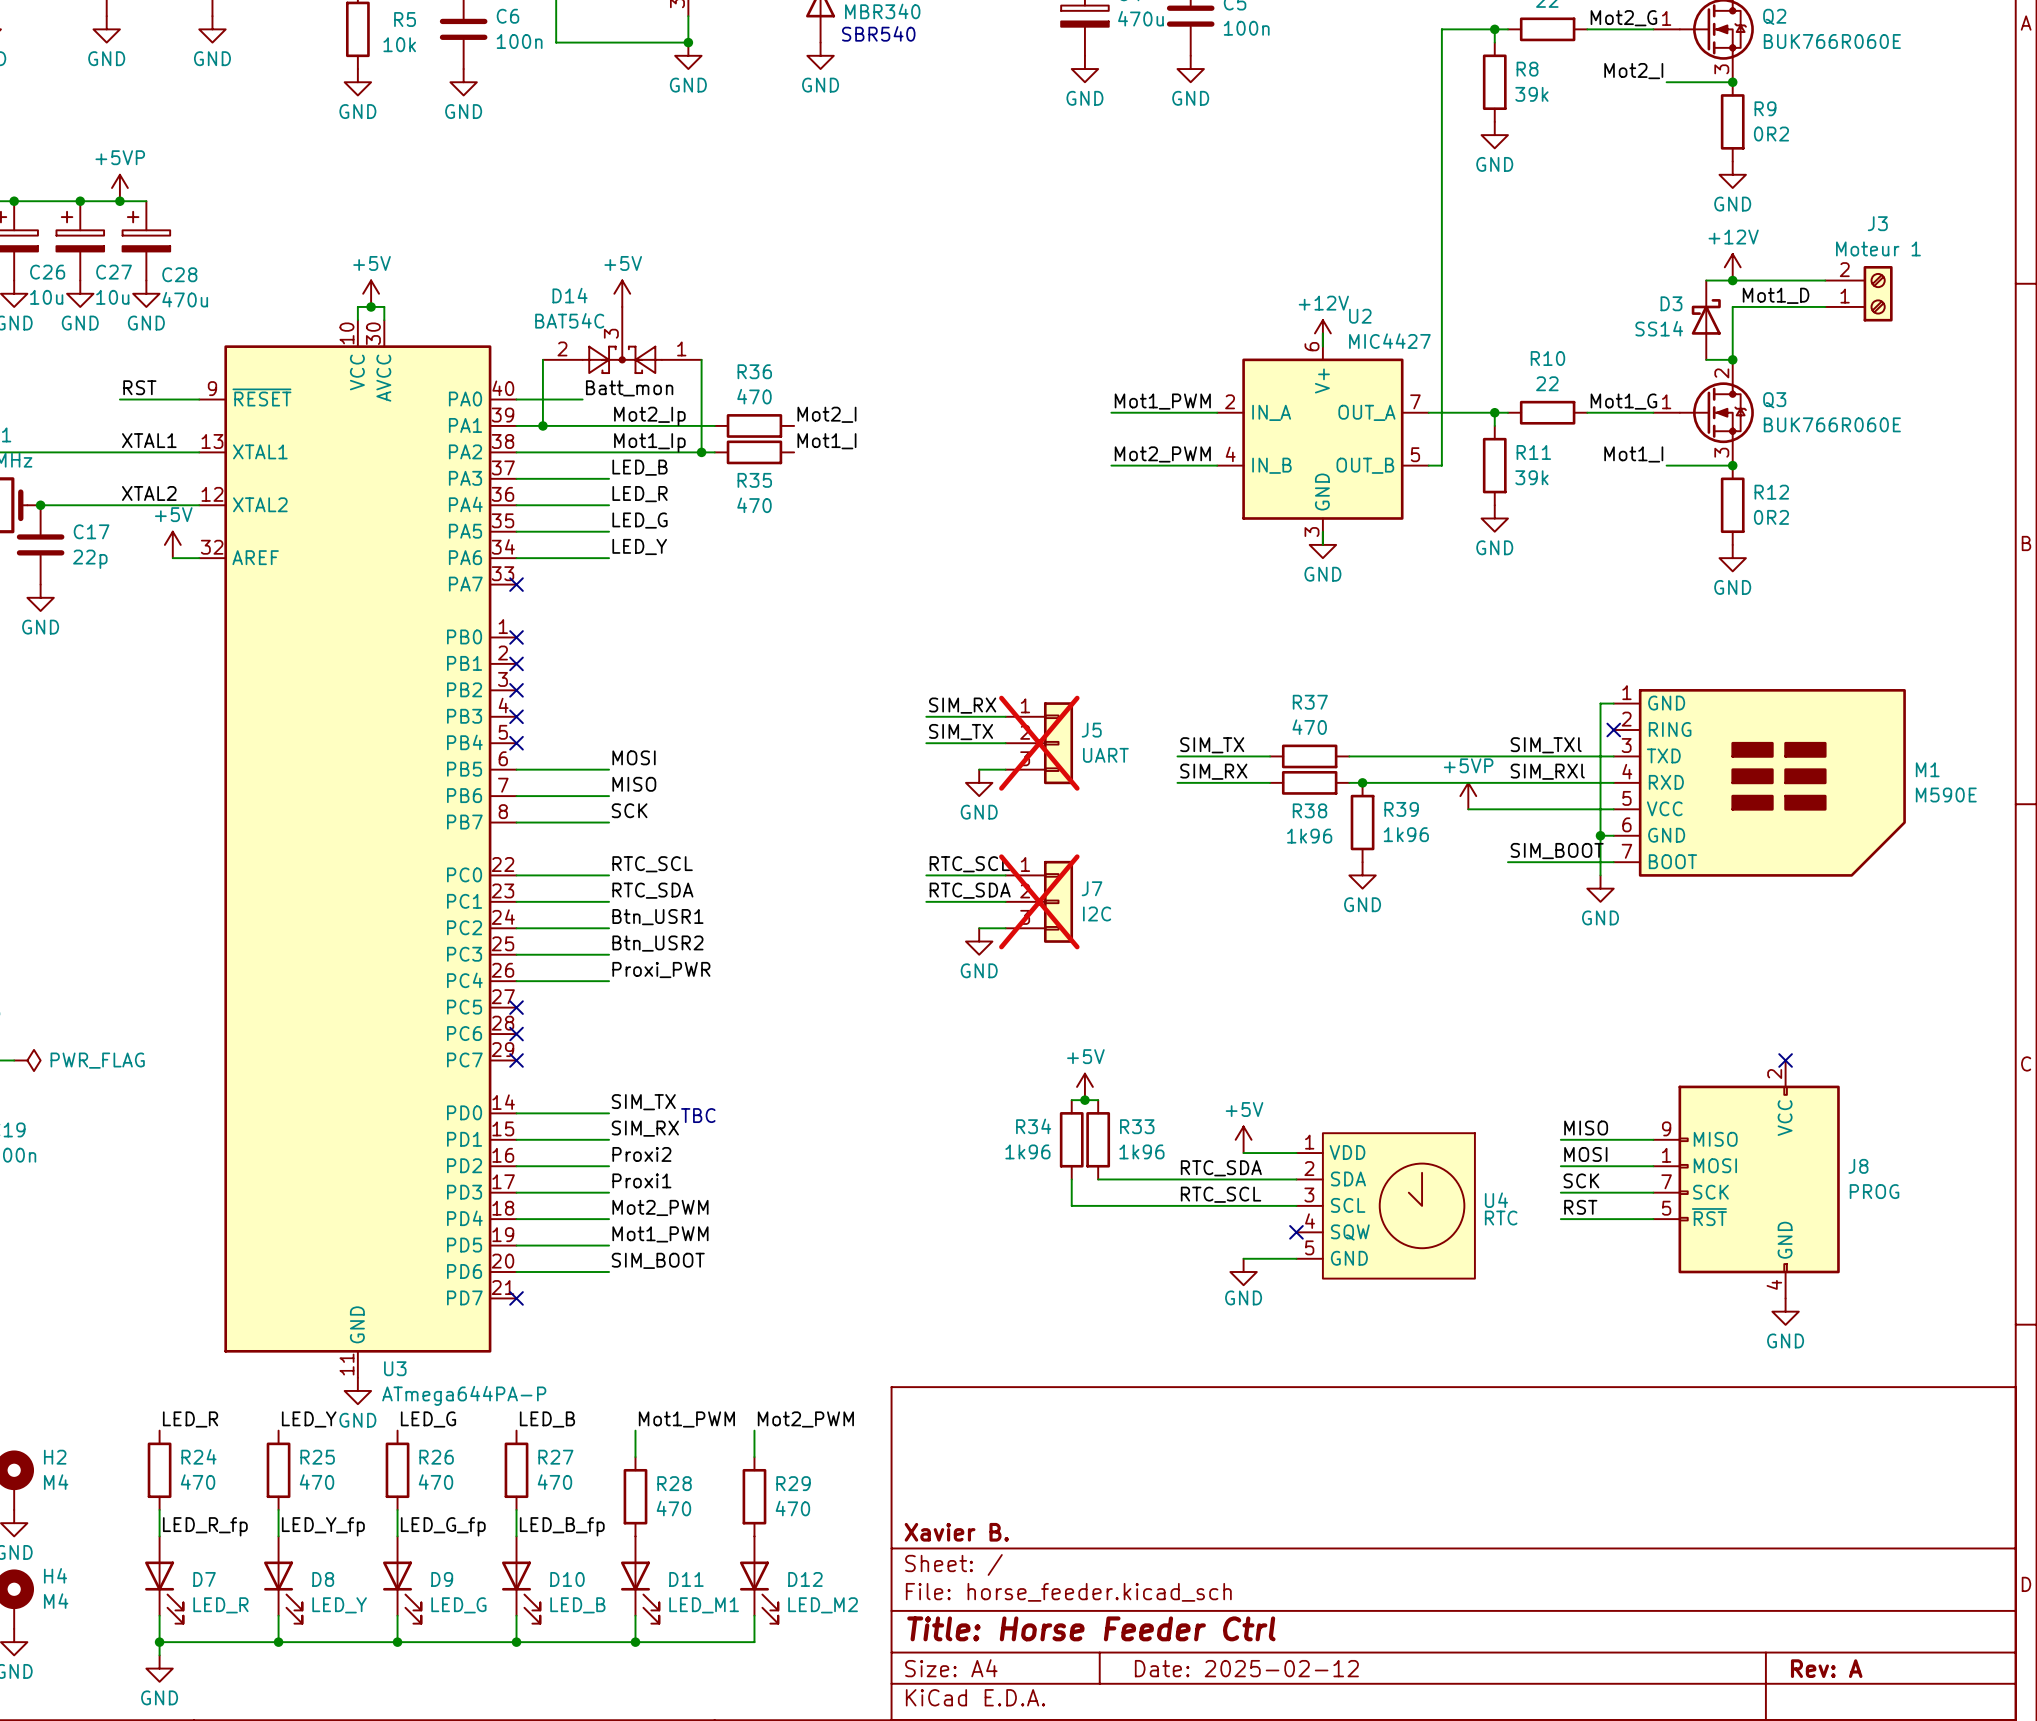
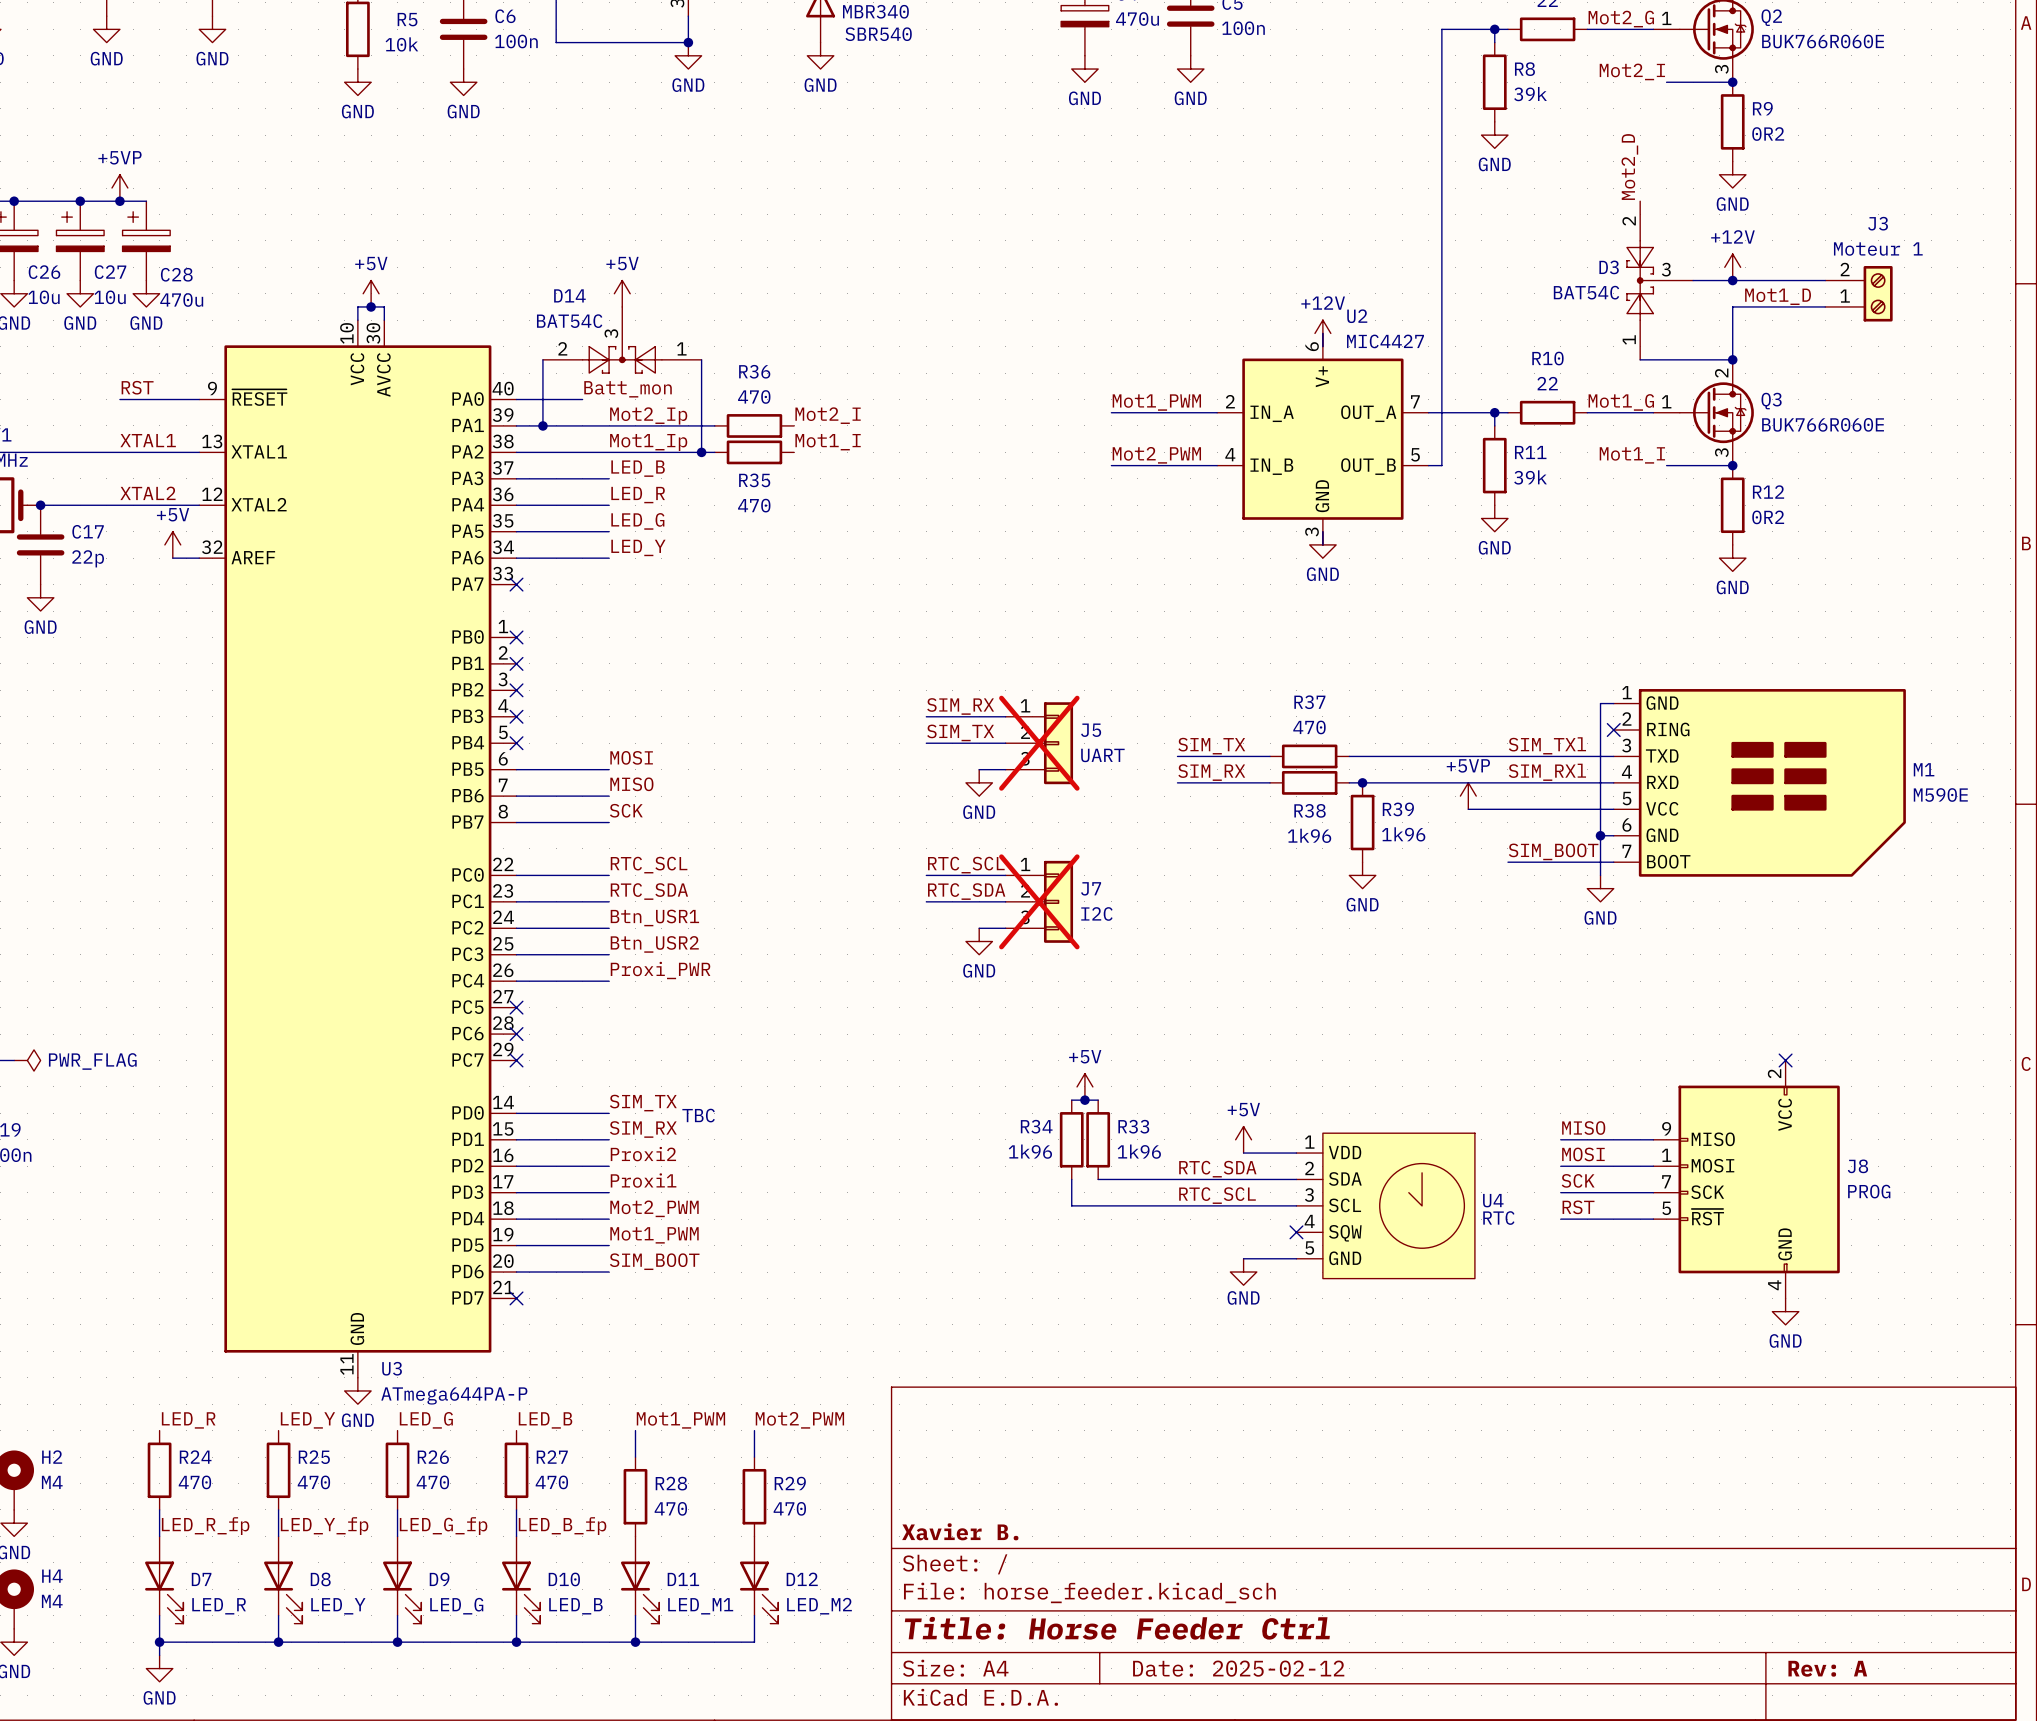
label: none -> Mot2_D (1629, 167)
D3 symbol: [1691, 280, 1721, 360] -> [1626, 201, 1694, 360]
wire: none -> (1693, 280) (1706, 280)
D3 value: SS14 (1659, 328) -> BAT54C (1586, 292)
wire: none -> (1640, 359) (1706, 359)

